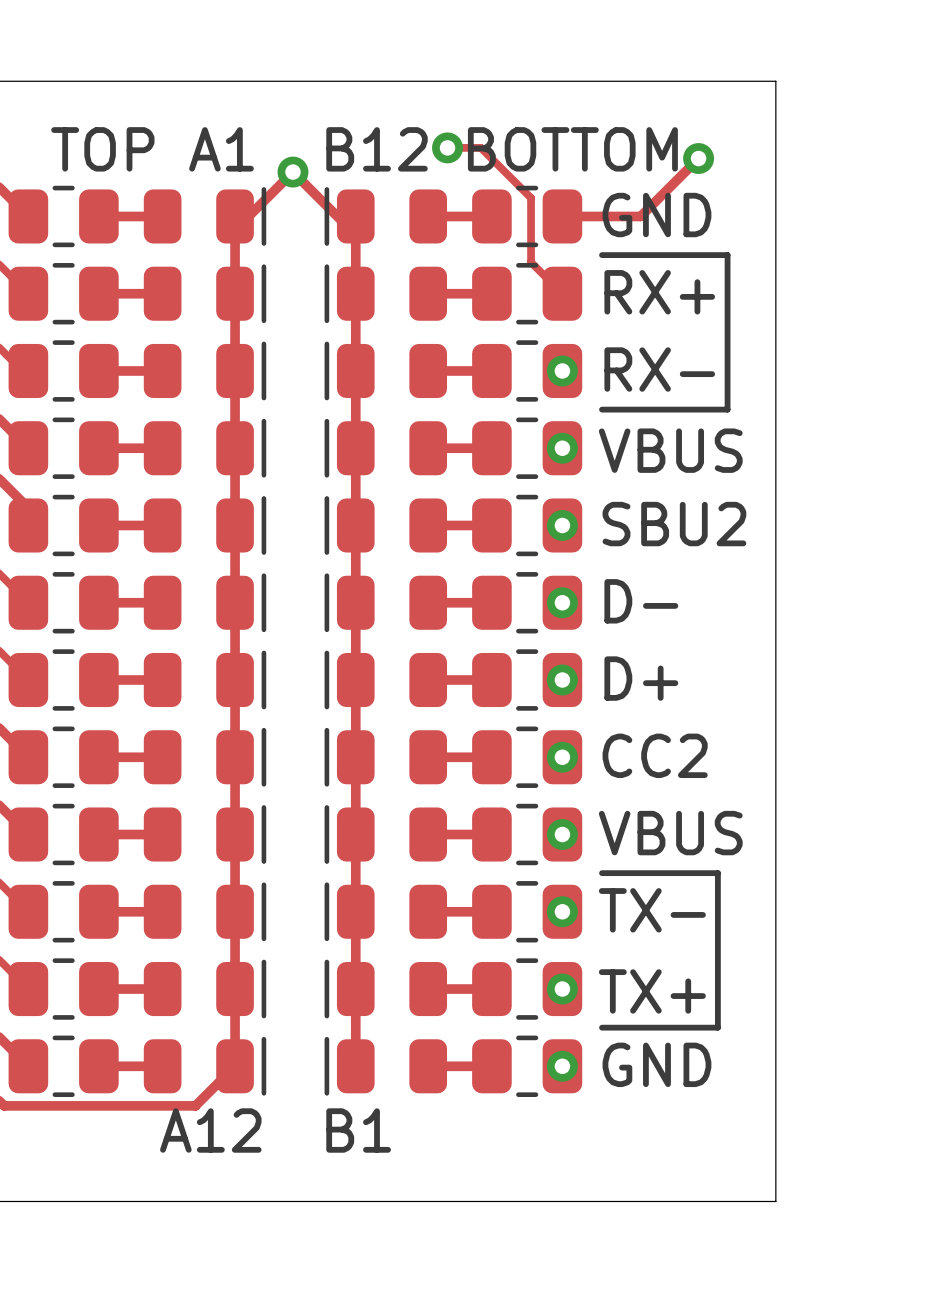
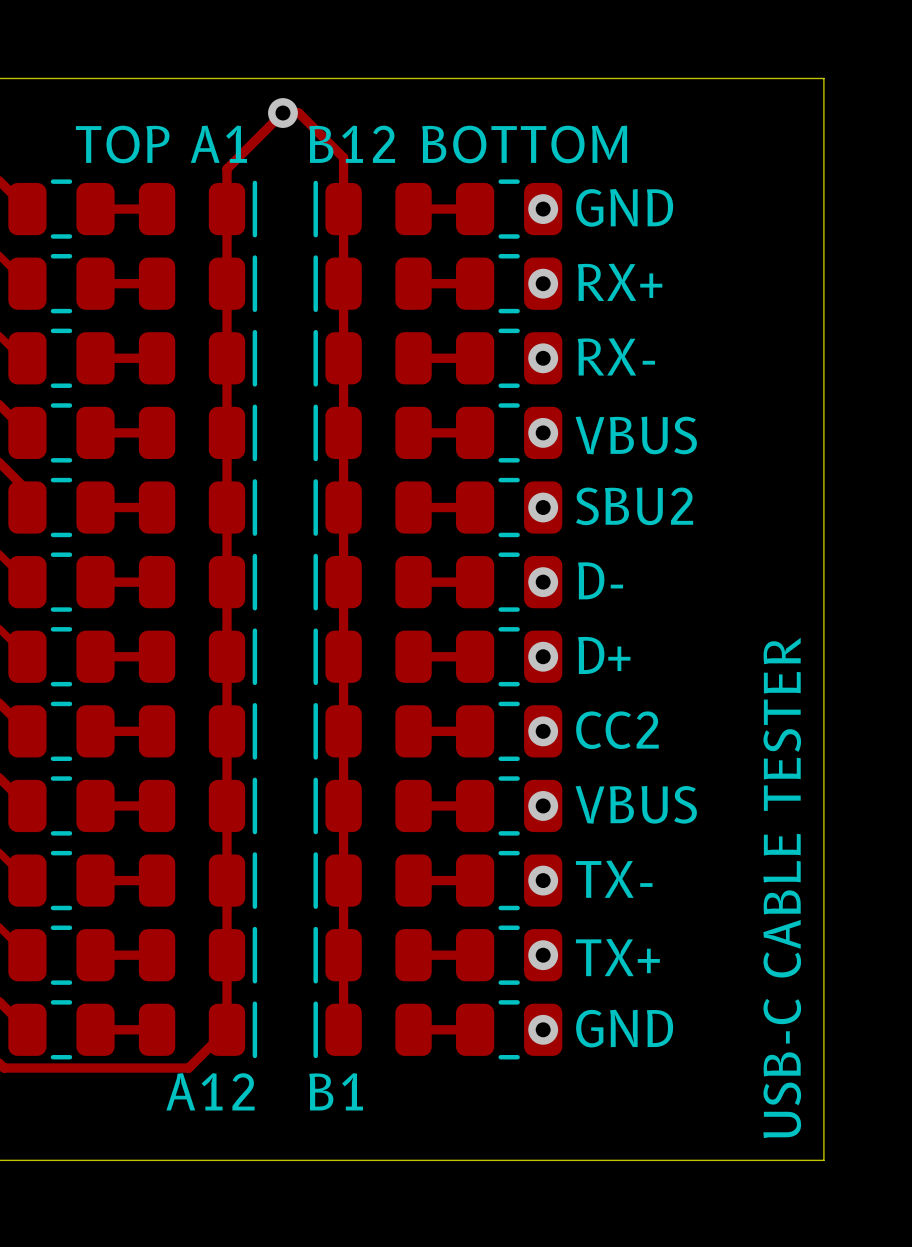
board edge: (775, 81) (775, 1201) -> (749, 78) (823, 78) (823, 1160) (749, 1160)
track: (447, 147) (480, 147) (531, 198) (531, 262) (562, 293) -> none
via: (447, 147) -> none
track: (698, 158) (640, 216) (562, 216) -> none
via: (698, 158) -> none
via position: (292, 172) -> (282, 113)
via: none -> (543, 209)
track: (235, 230) (292, 172) (355, 234) -> (227, 222) (227, 168) (282, 113) (298, 113) (343, 157) (343, 226)
line: (602, 255) (727, 255) (727, 409) (602, 409) -> none
via: none -> (543, 283)
text: none -> USB-C CABLE TESTER (782, 887)
line: (602, 873) (717, 873) (717, 1027) (602, 1027) -> none

